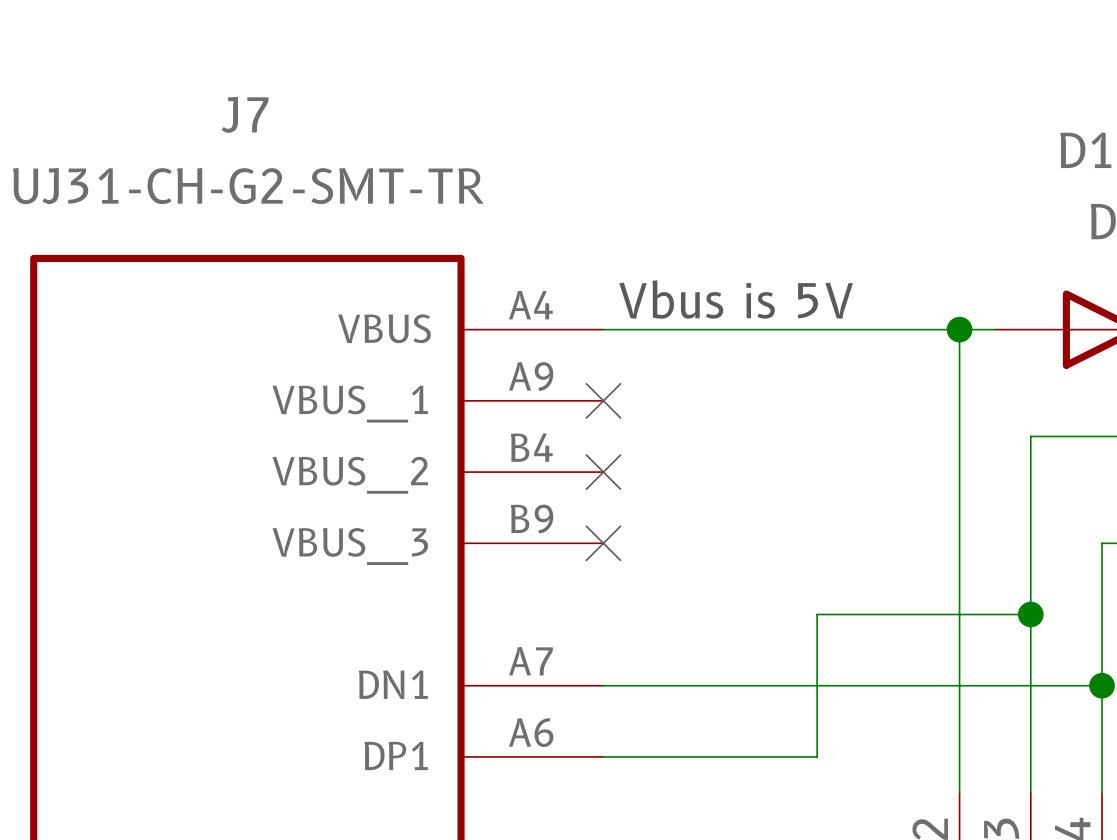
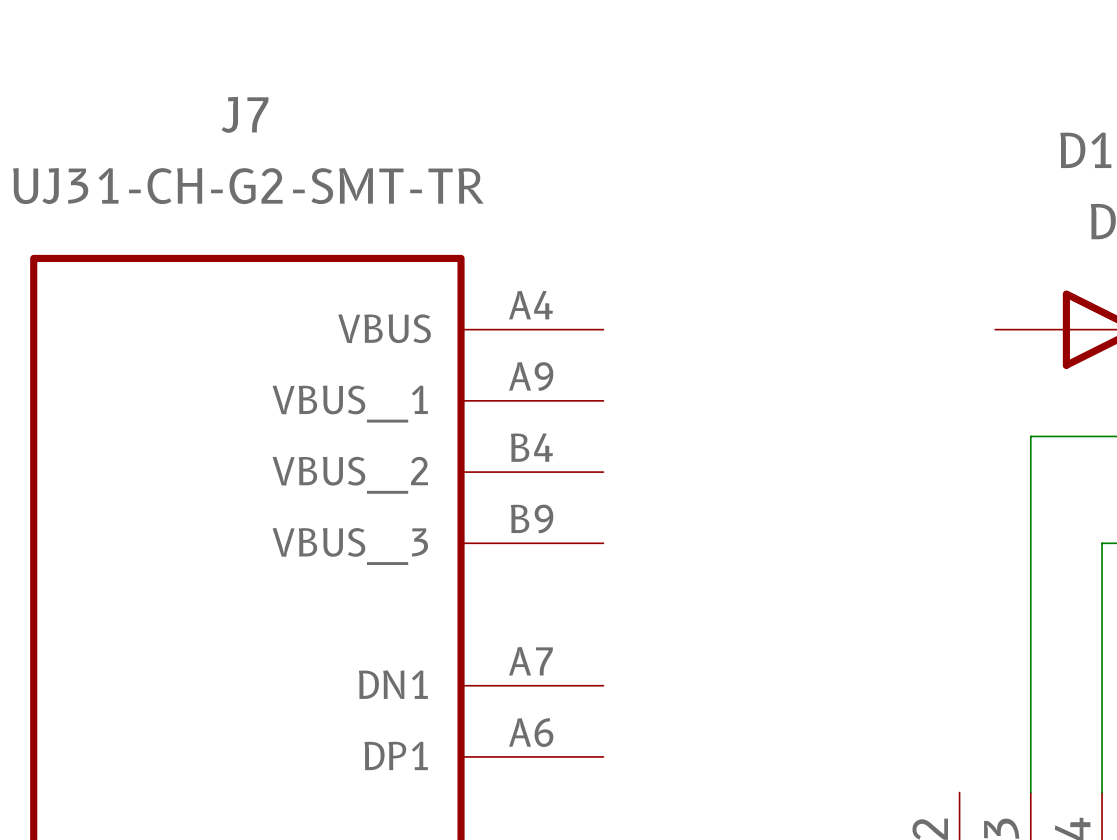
text: Vbus is 5V (736, 299) -> none
wire: (603, 329) (995, 329) -> none
wire: (959, 329) (959, 792) -> none
junction: (959, 329) -> none
no-connect mark: (603, 400) -> none
no-connect mark: (603, 472) -> none
no-connect mark: (603, 543) -> none
wire: (1030, 614) (817, 614) (817, 756) (603, 756) -> none
junction: (1030, 614) -> none
wire: (603, 685) (1102, 685) -> none
junction: (1102, 685) -> none

